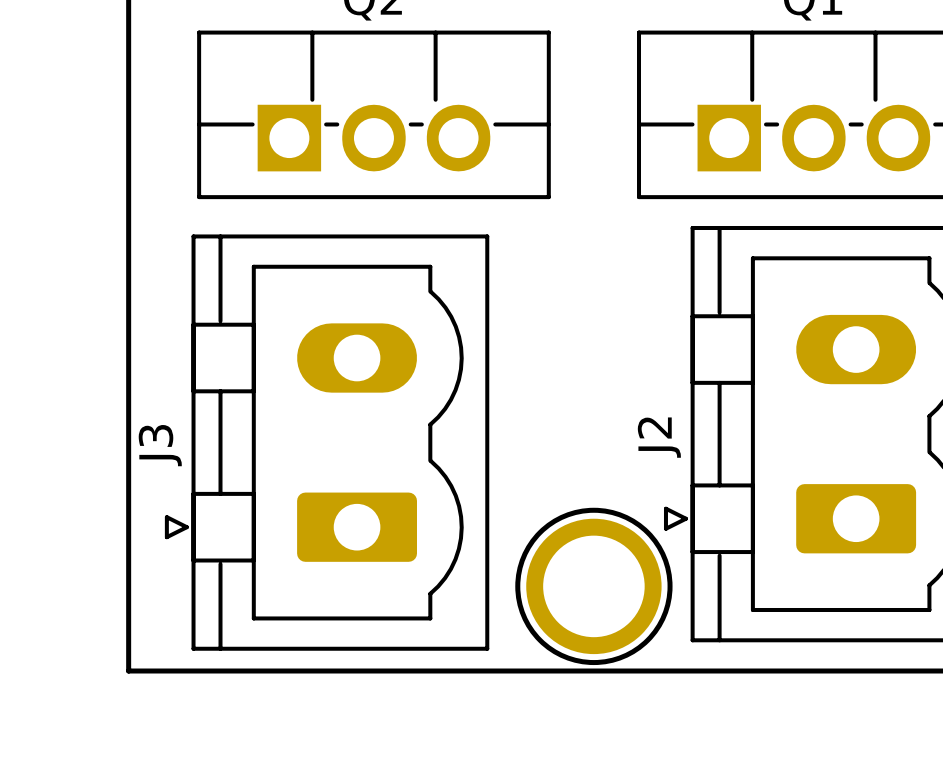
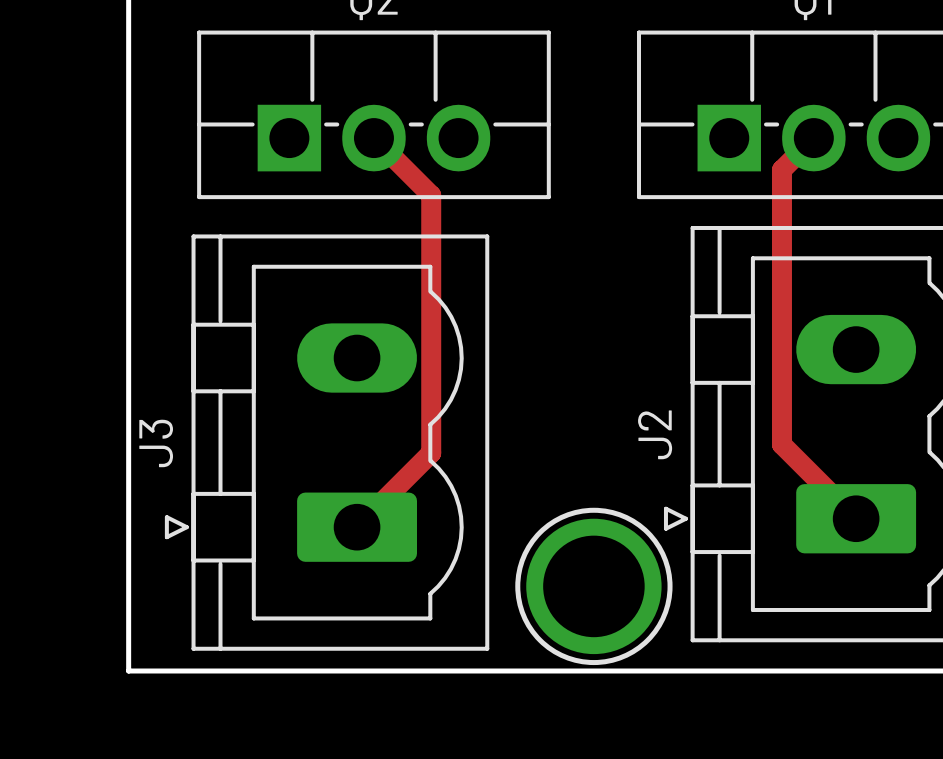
track: none -> (373, 138) (431, 195) (431, 453) (357, 527)
track: none -> (813, 138) (781, 169) (781, 444) (856, 518)

